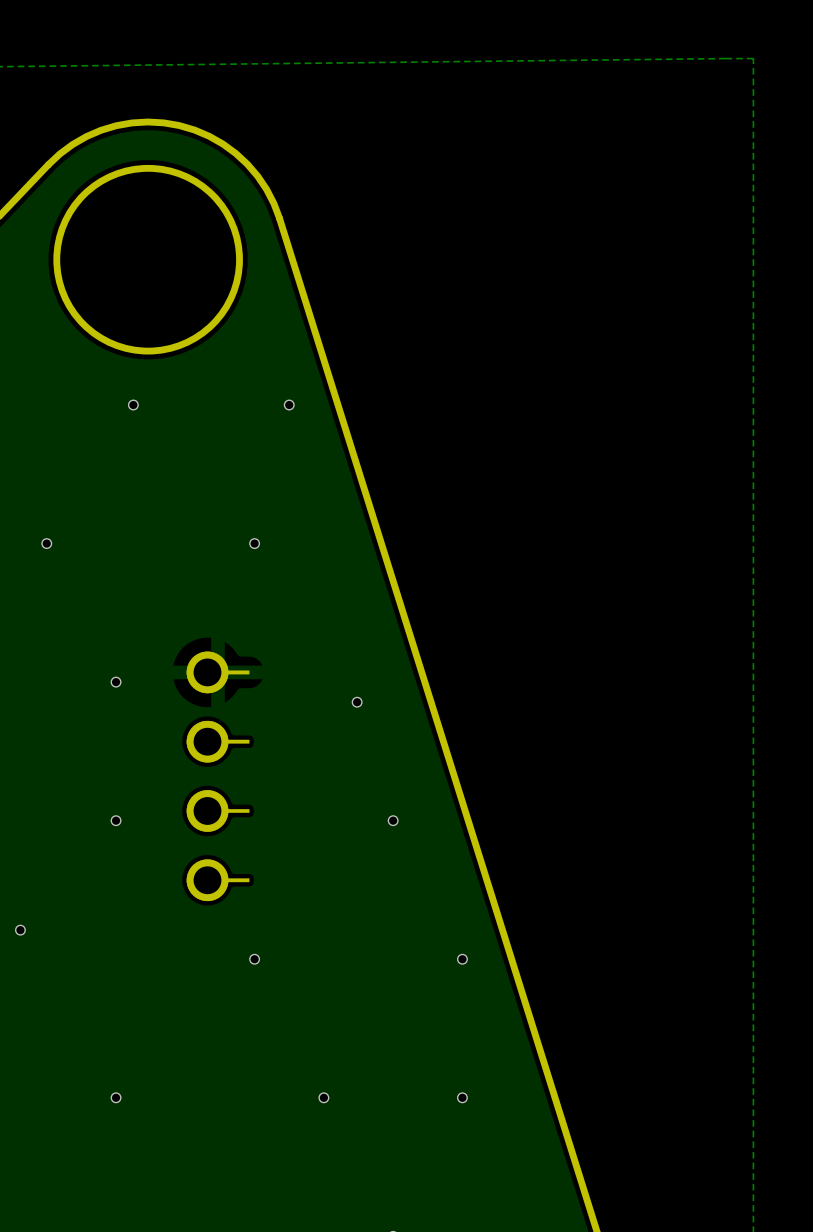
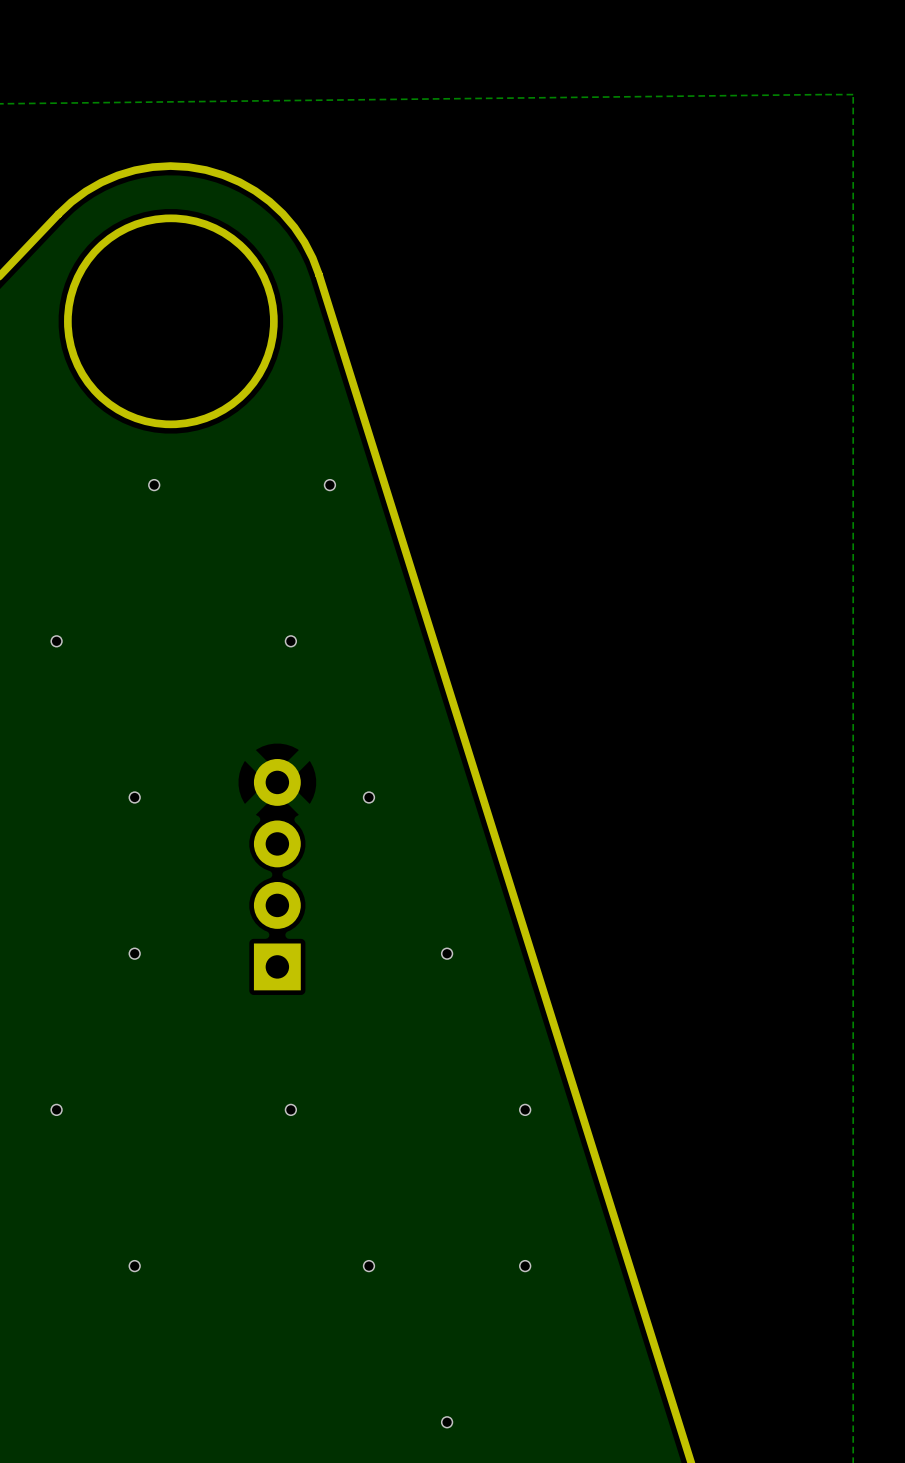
via position: (357, 702) -> (368, 797)
part: none -> (277, 874)
part: (218, 776) -> none
via position: (20, 930) -> (56, 1109)

